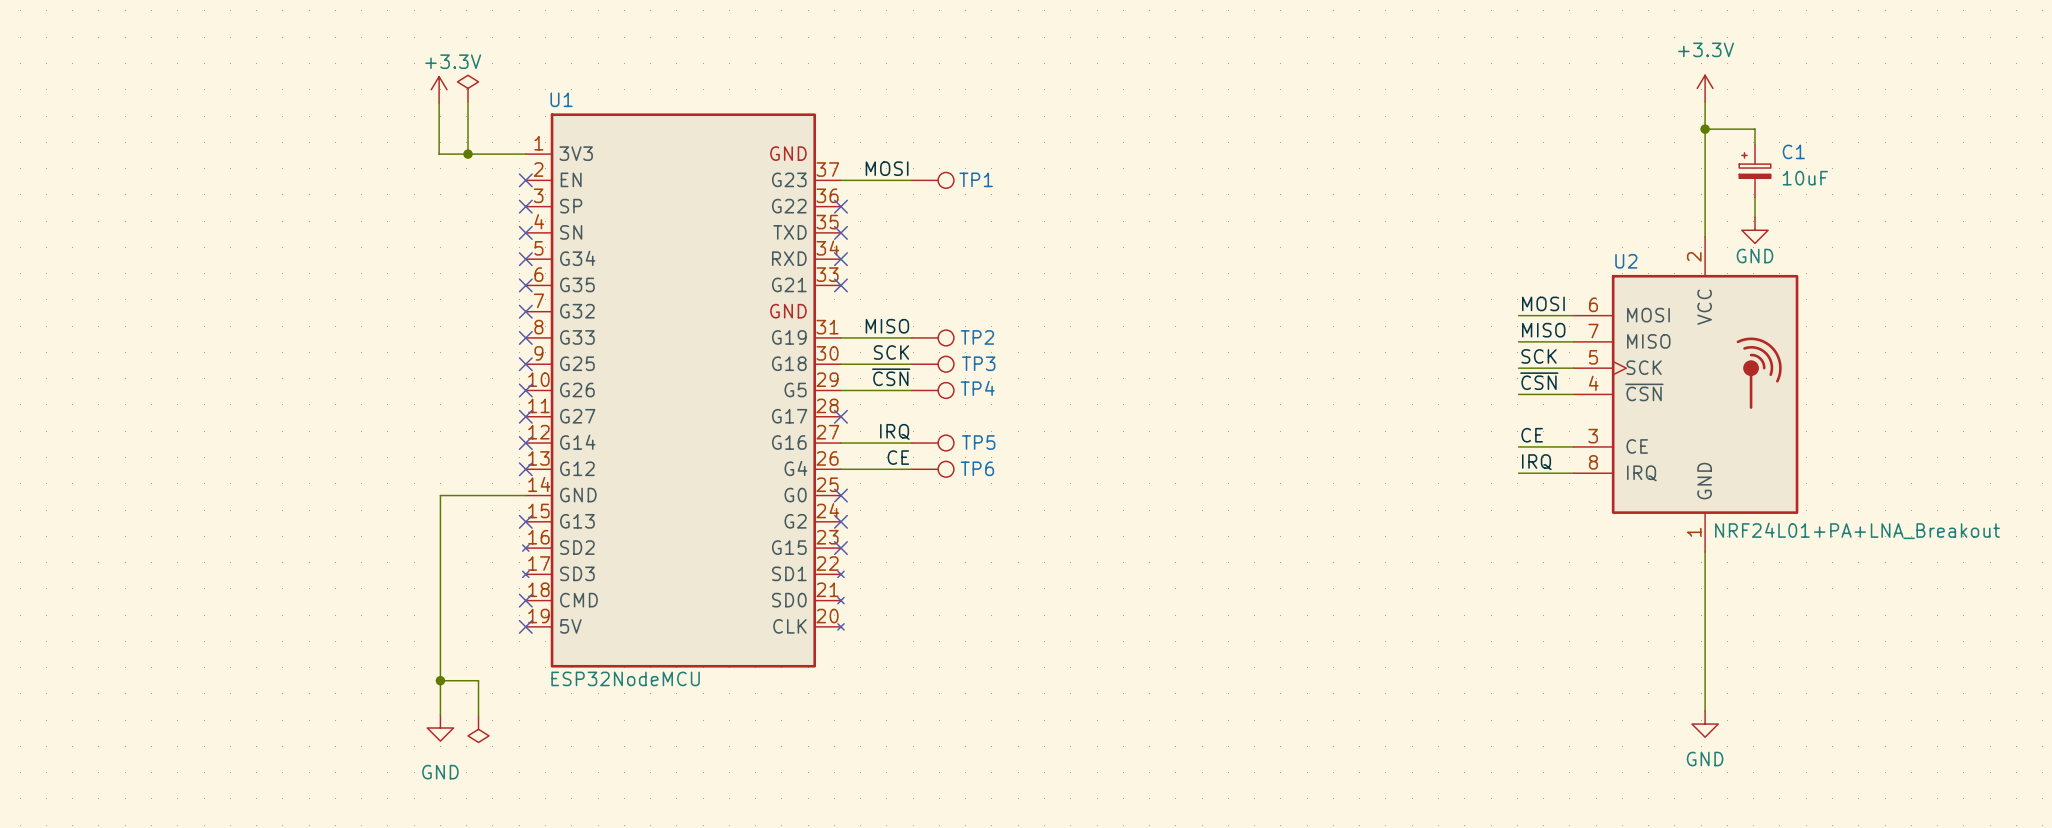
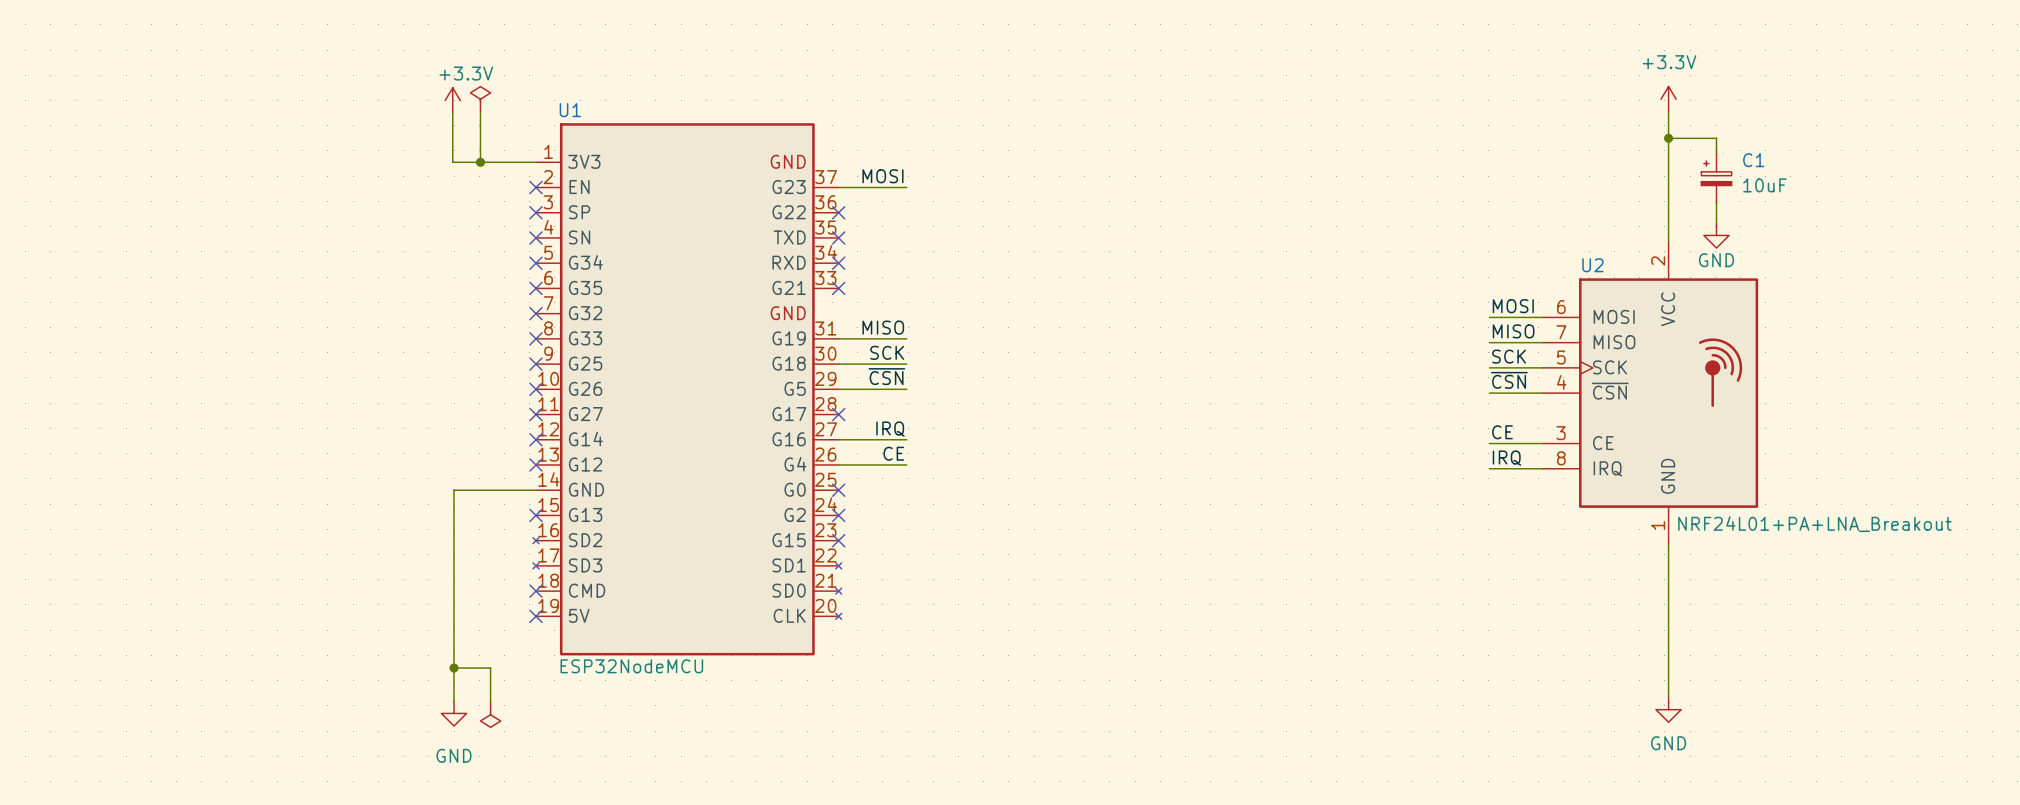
TP1: (932, 180) -> none
TP2: (932, 337) -> none
TP3: (932, 364) -> none
TP4: (932, 390) -> none
TP5: (932, 443) -> none
TP6: (932, 469) -> none

